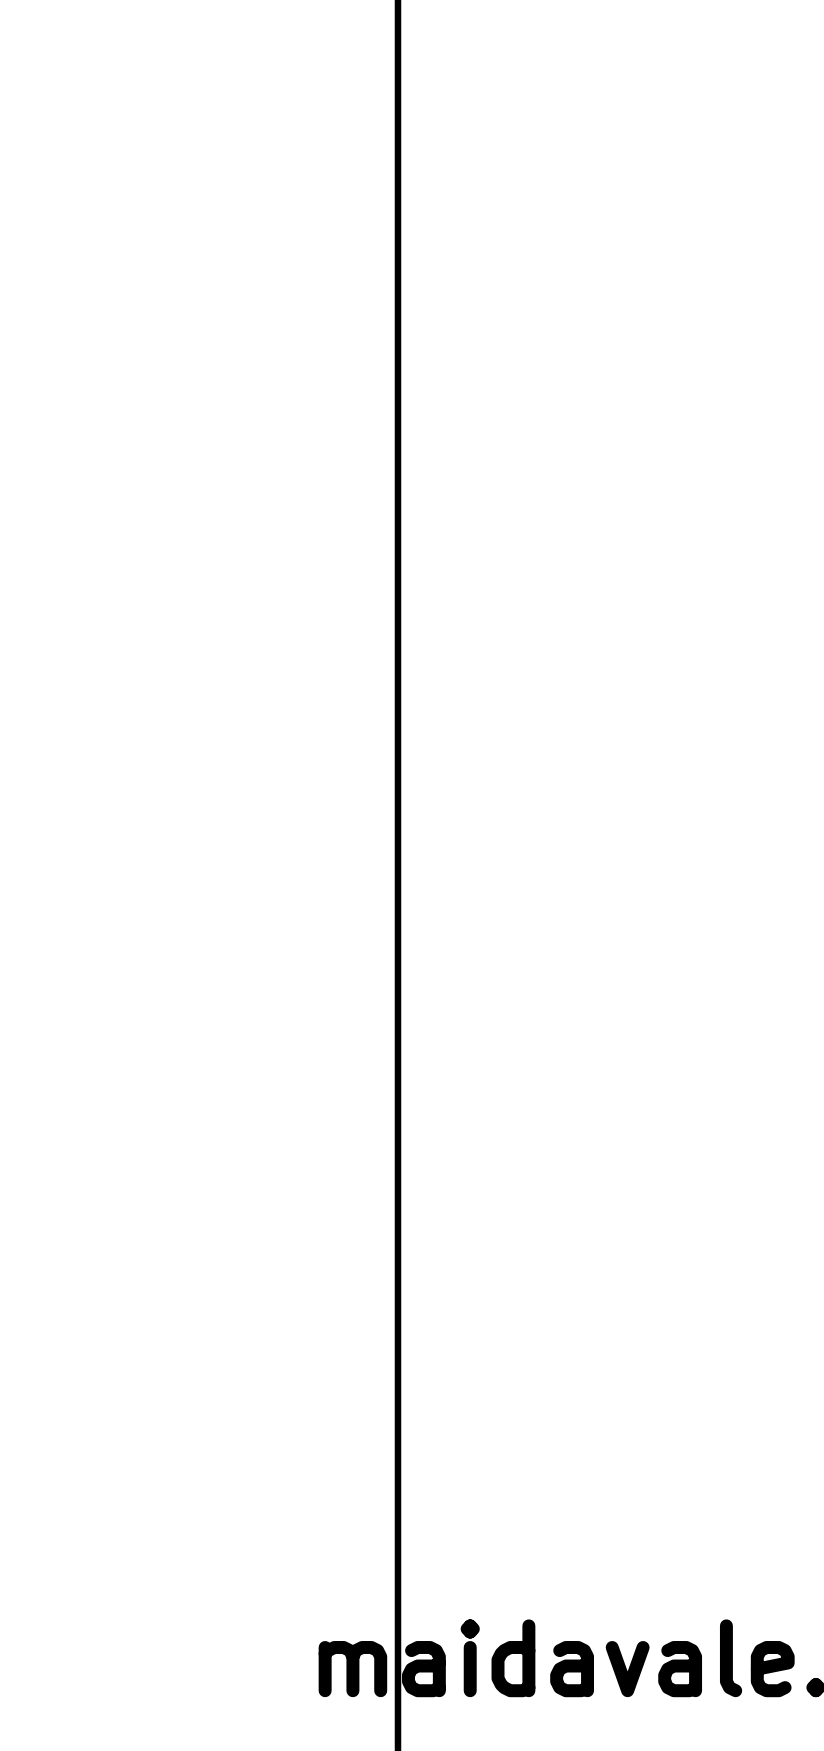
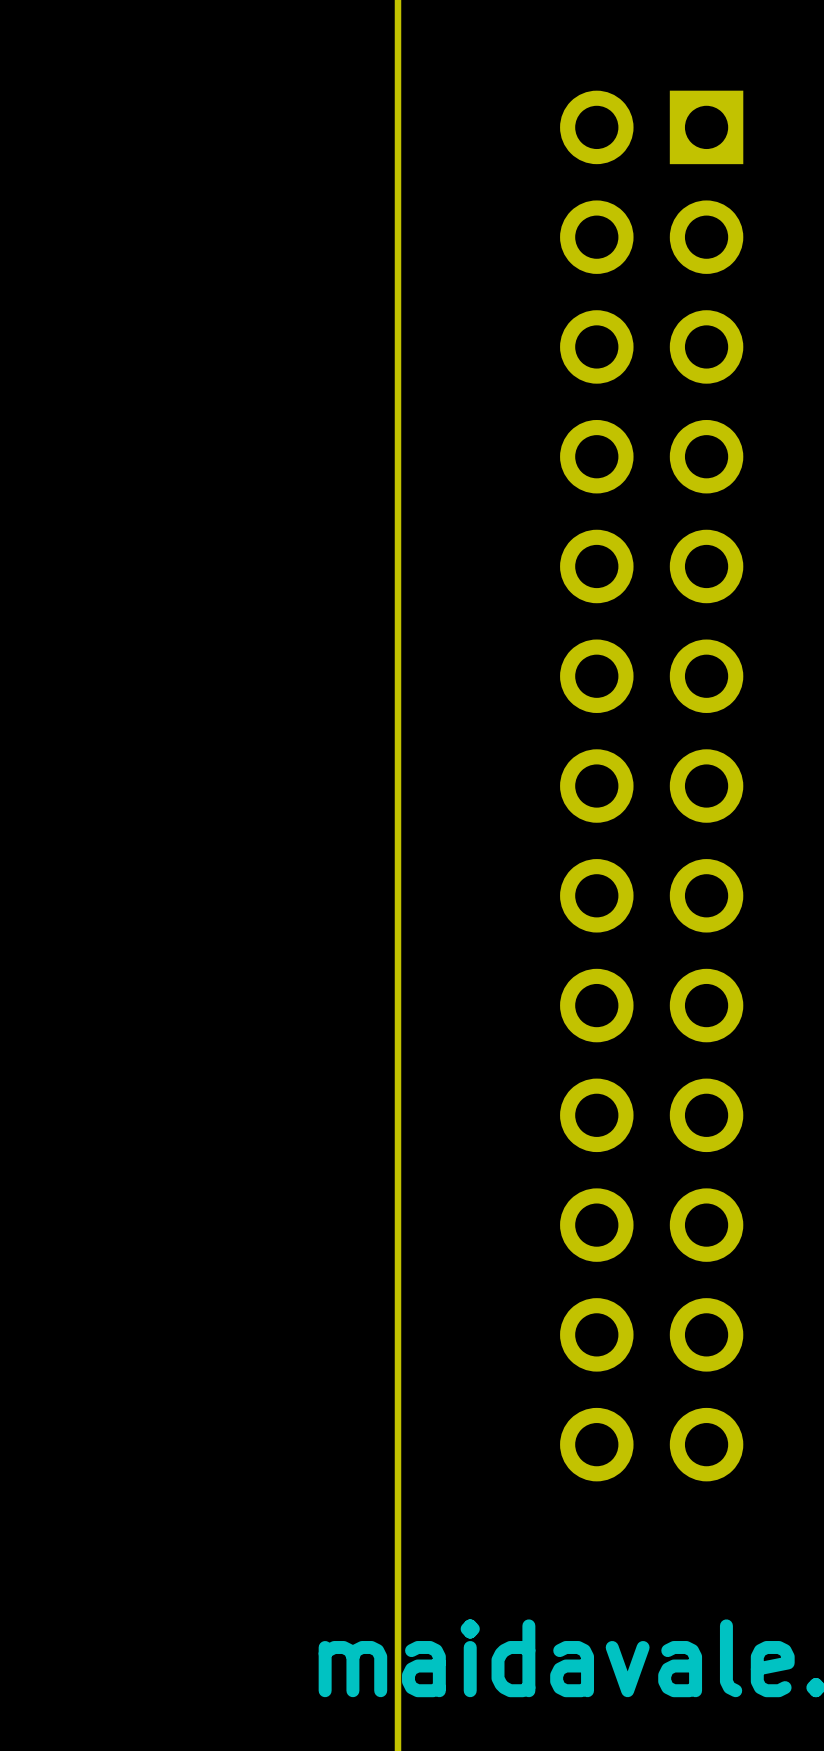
part: none -> (651, 786)

